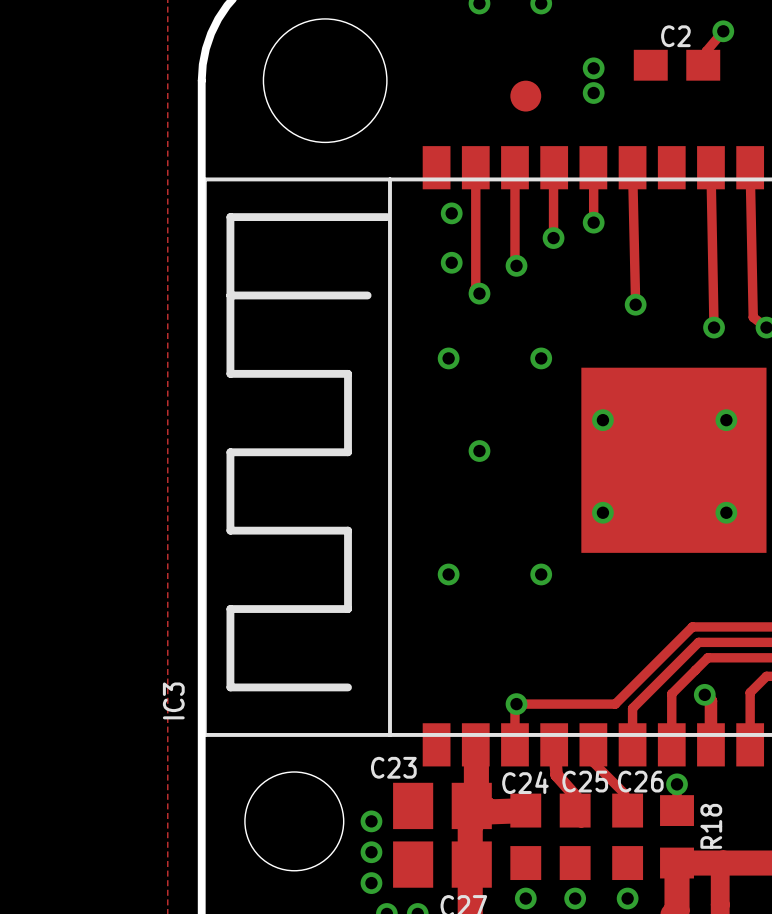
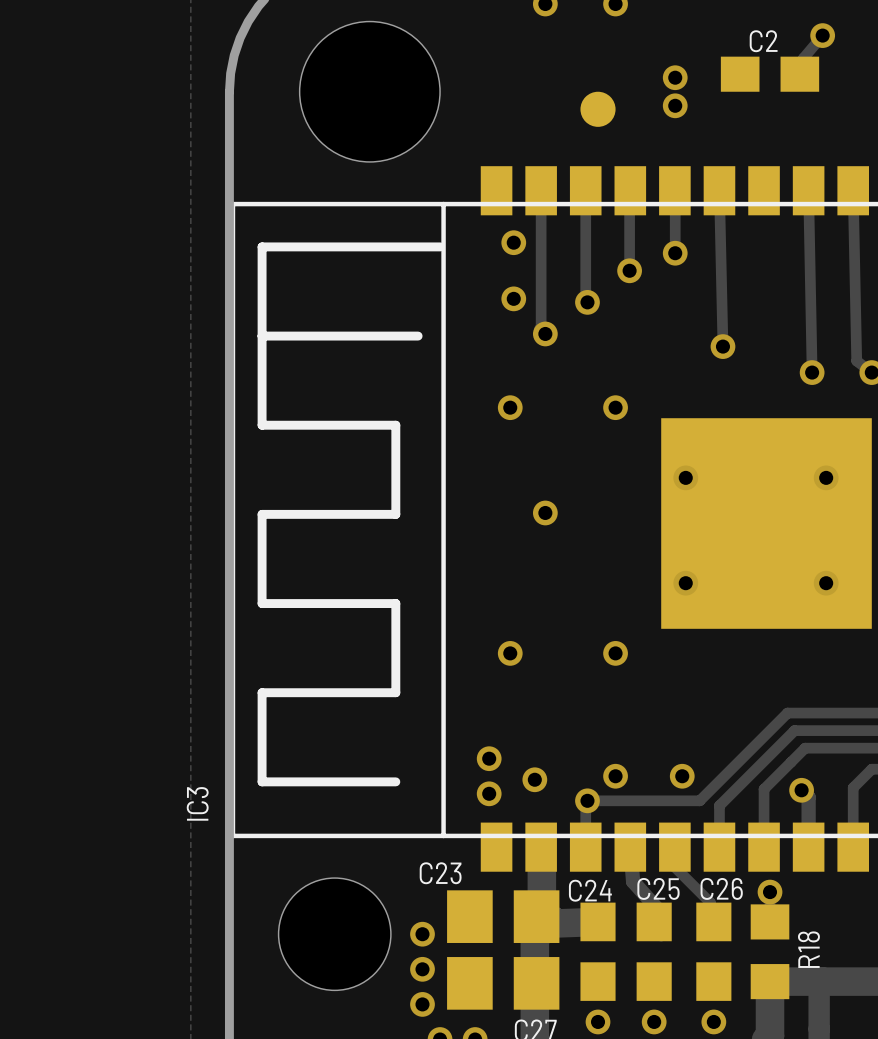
via: none -> (489, 758)
via: none -> (615, 776)
via: none -> (682, 776)
via: none -> (534, 779)
via: none -> (489, 793)

